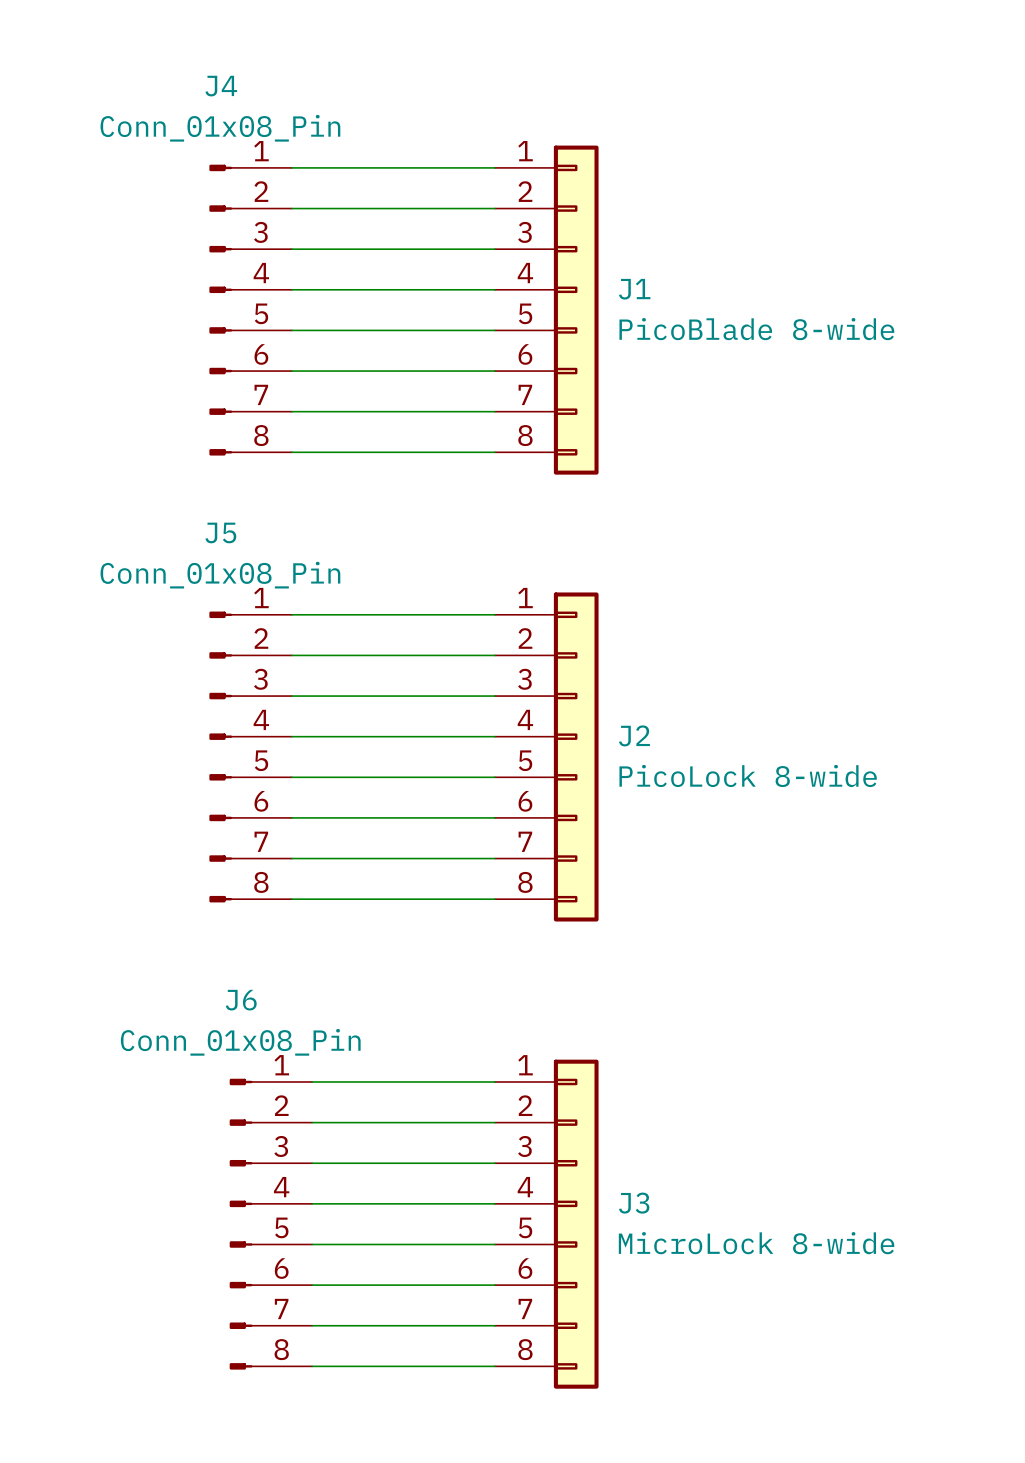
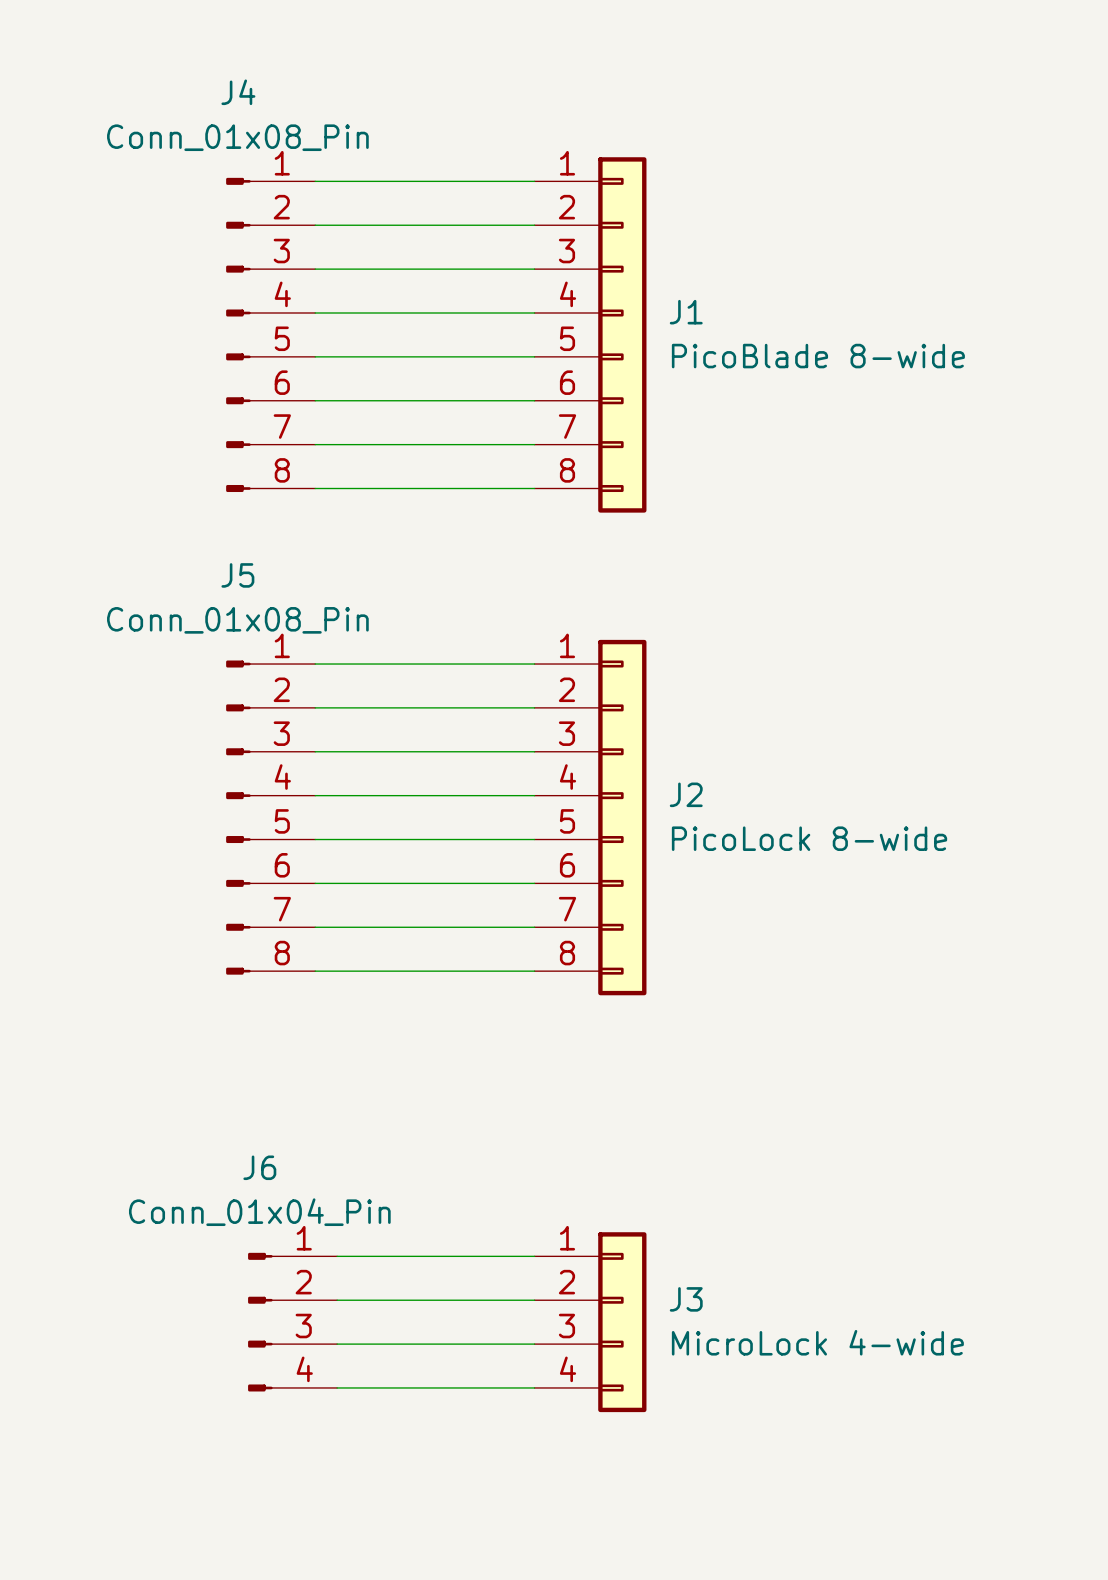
J6 name position: J6 (241, 1000) -> J6 (259, 1167)
J6 value: Conn_01x08_Pin (240, 1042) -> Conn_01x04_Pin (259, 1212)
J3 symbol: [494, 1059, 599, 1389] -> [534, 1232, 647, 1413]
J6 symbol: [229, 1078, 313, 1370] -> [248, 1252, 338, 1392]
wire: (312, 1081) (494, 1081) -> none
wire: (312, 1122) (494, 1122) -> none
J3 value: MicroLock 8-wide (756, 1243) -> MicroLock 4-wide (817, 1342)
wire: (312, 1325) (494, 1325) -> none
wire: (312, 1366) (494, 1366) -> none

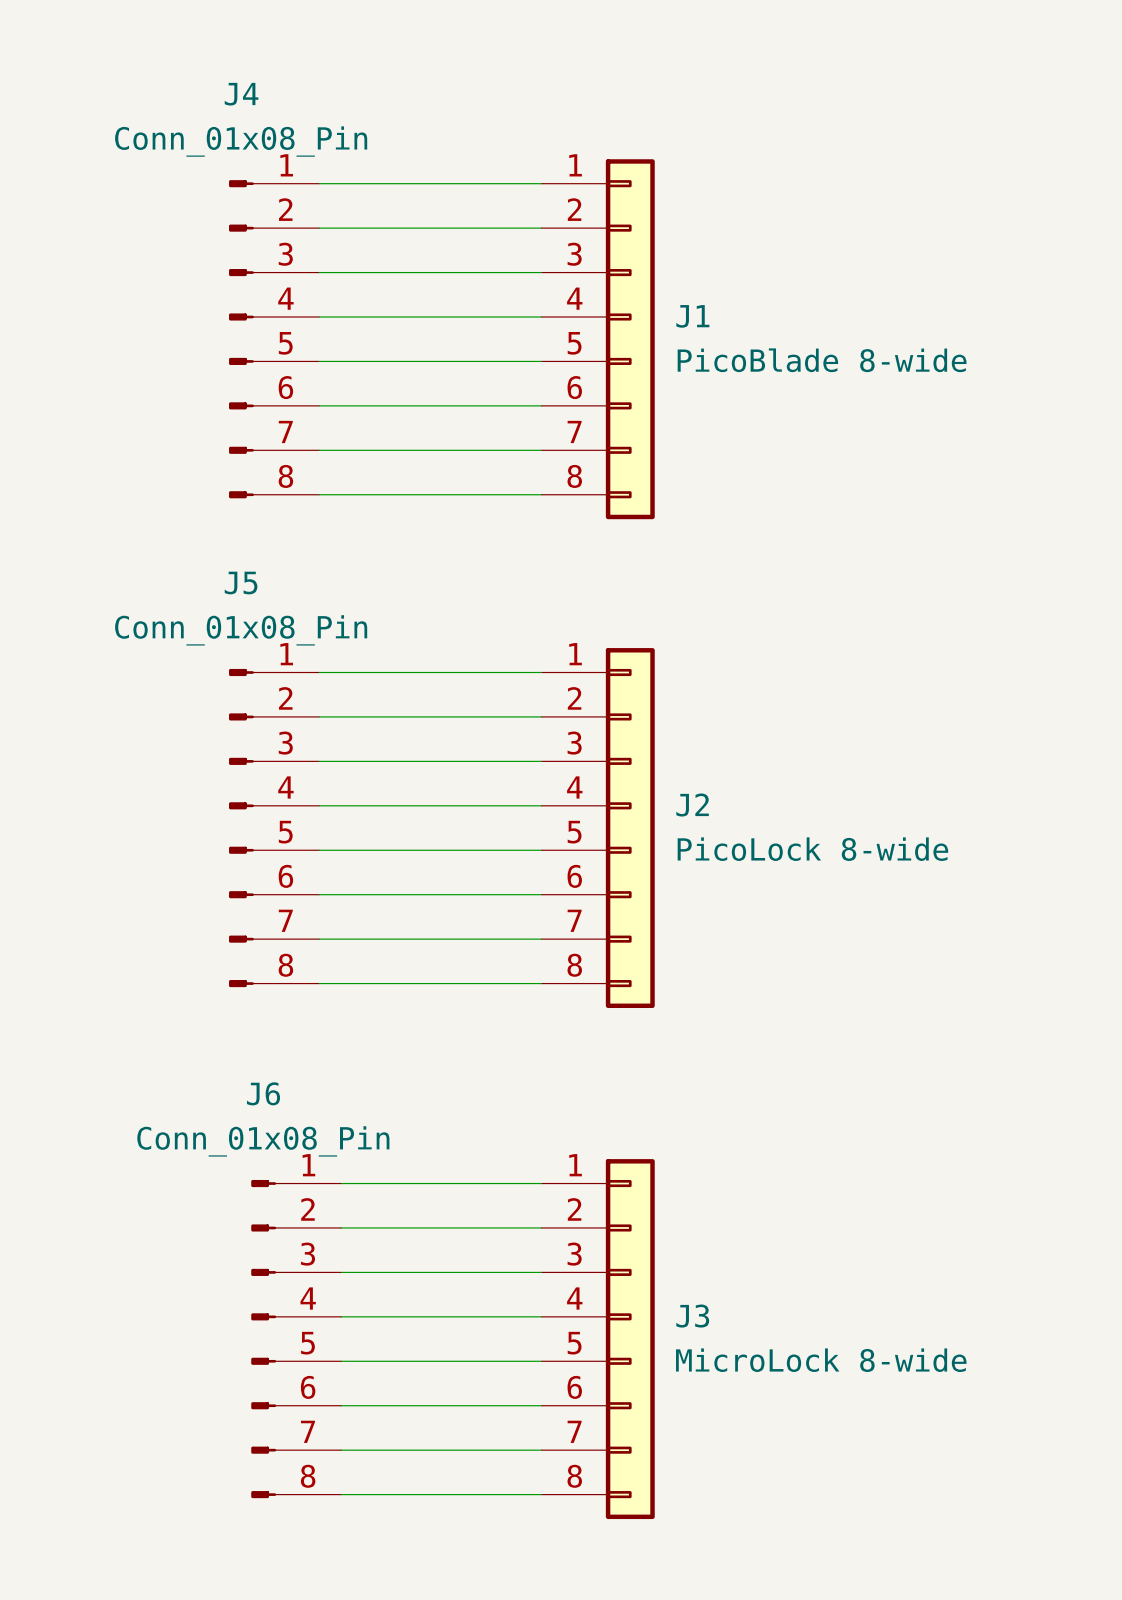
J6 name position: J6 (259, 1167) -> J6 (263, 1093)
wire: none -> (341, 1183) (541, 1183)
J6 value: Conn_01x04_Pin (259, 1212) -> Conn_01x08_Pin (263, 1141)
wire: none -> (341, 1227) (541, 1227)
J3 symbol: [534, 1232, 647, 1413] -> [541, 1159, 655, 1520]
J6 symbol: [248, 1252, 338, 1392] -> [251, 1179, 342, 1499]
J3 value: MicroLock 4-wide (817, 1342) -> MicroLock 8-wide (821, 1360)
wire: none -> (341, 1450) (541, 1450)
wire: none -> (341, 1494) (541, 1494)

